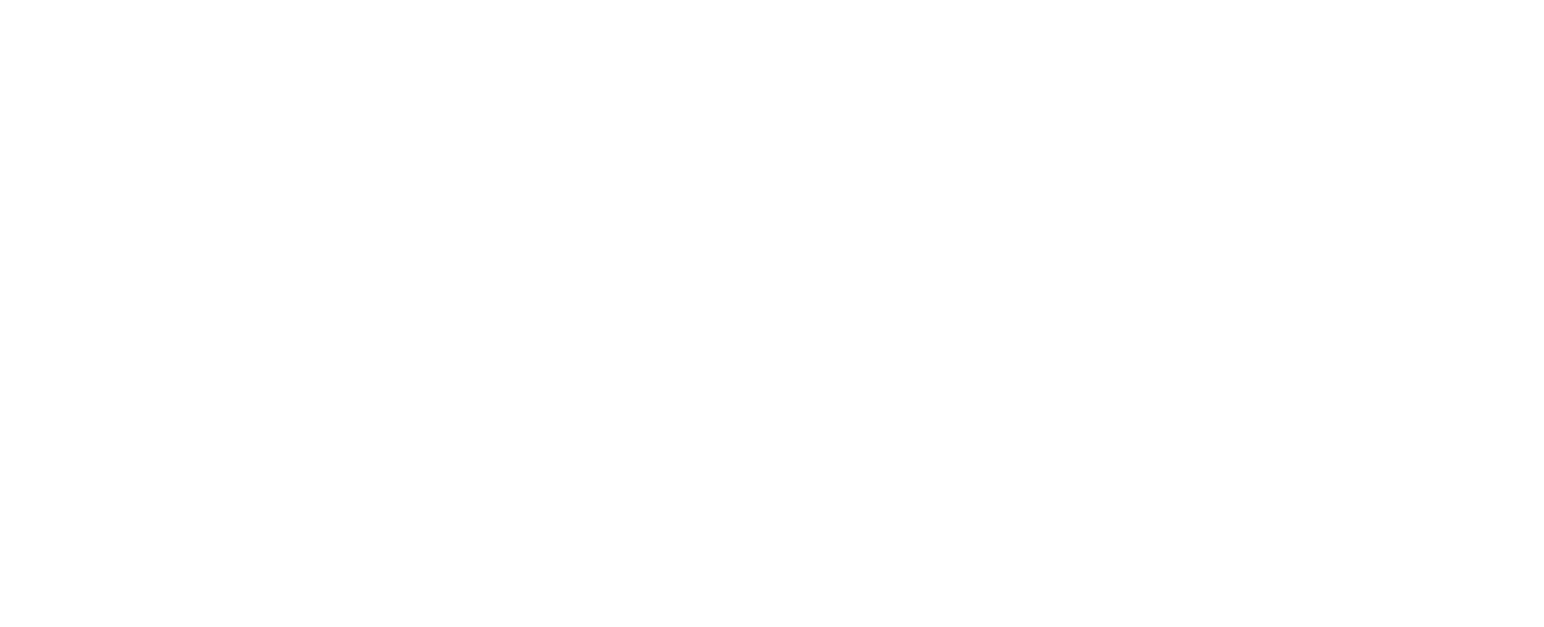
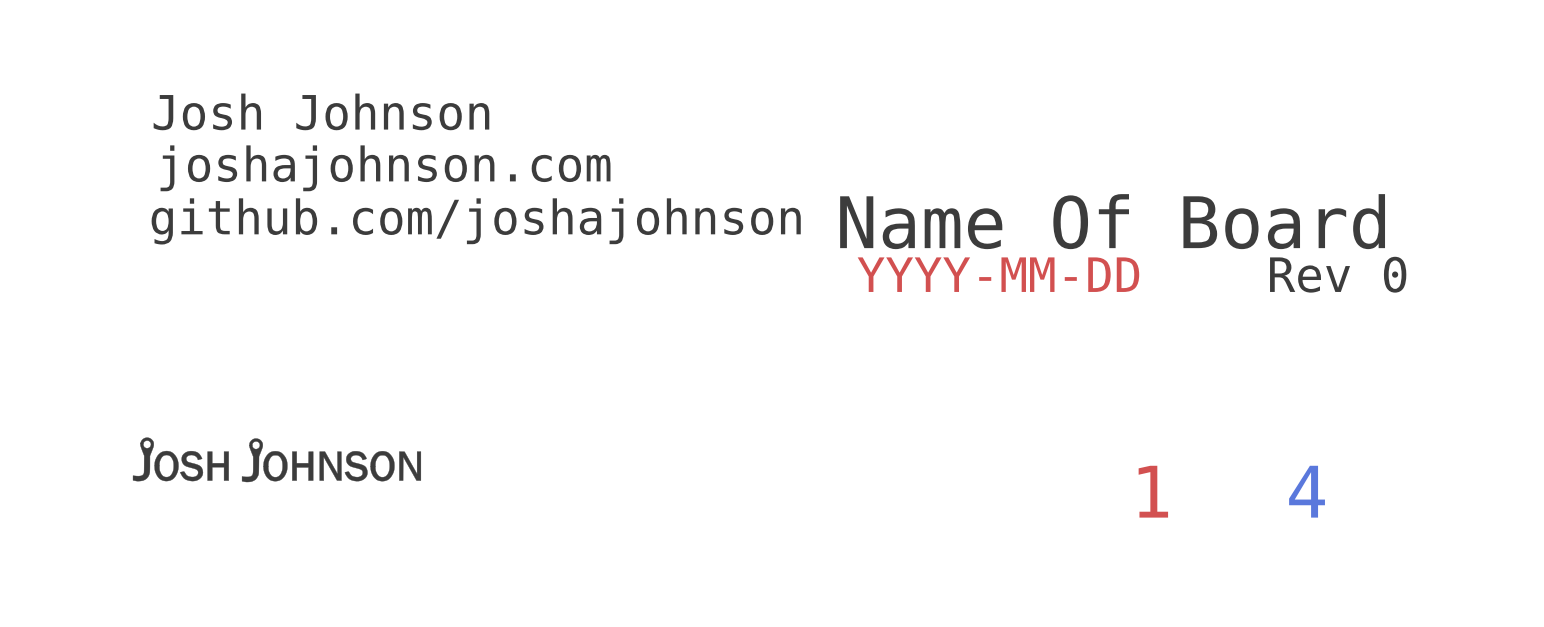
drawing: none -> [151, 93, 1407, 293]
drawing: none -> [132, 437, 422, 483]
drawing: none -> [1138, 465, 1325, 518]

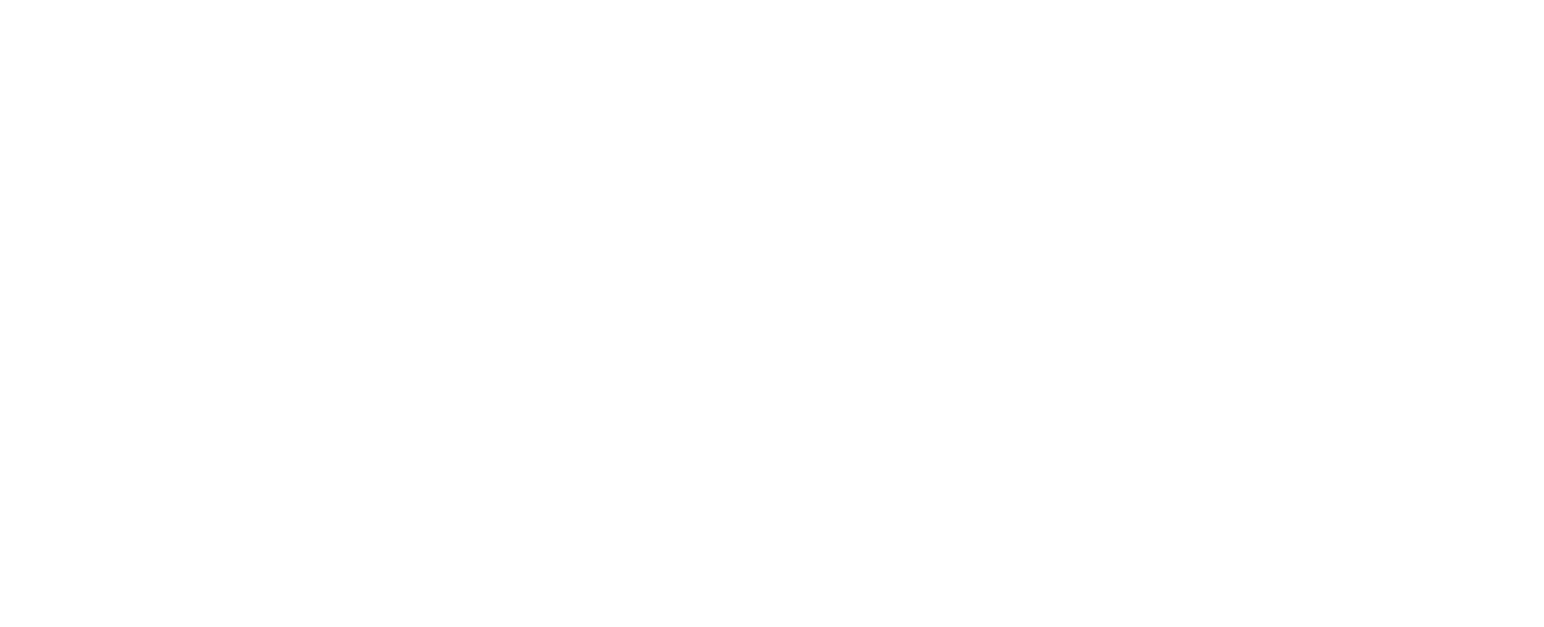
drawing: [151, 93, 1407, 293] -> none
drawing: [132, 437, 422, 483] -> none
drawing: [1138, 465, 1325, 518] -> none

